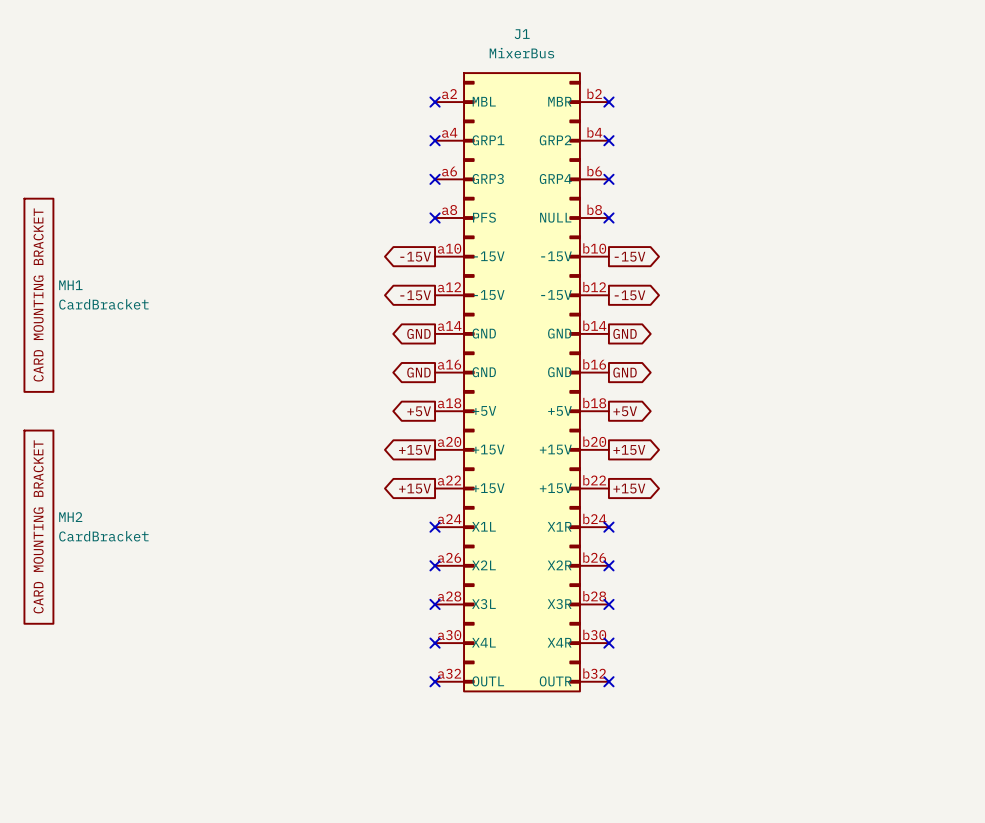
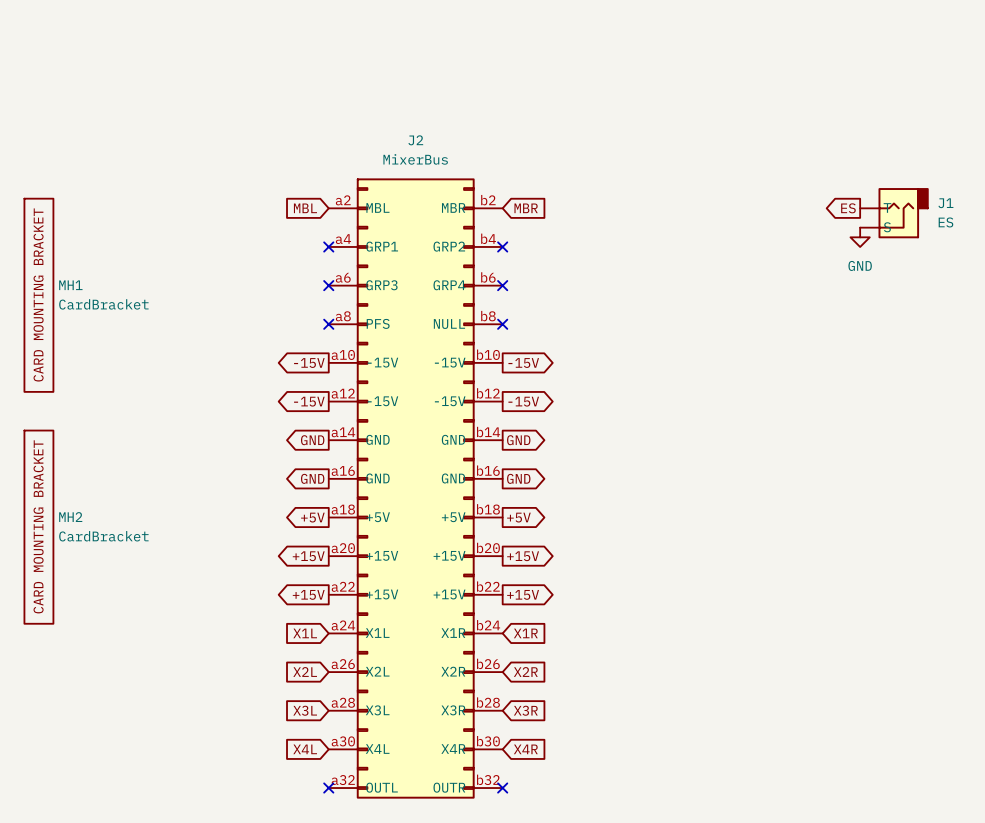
J1 name position: J1 (522, 34) -> J1 (945, 203)
J1 value: MixerBus (521, 53) -> ES (945, 222)
J1 symbol: [435, 72, 609, 693] -> [860, 188, 929, 239]
no-connect mark: (435, 102) -> none
no-connect mark: (608, 102) -> none
no-connect mark: (435, 140) -> none
no-connect mark: (608, 140) -> none
no-connect mark: (435, 179) -> none
no-connect mark: (608, 179) -> none
global label: none -> MBL (305, 208)
global label: none -> MBR (526, 208)
global label: none -> ES (848, 208)
no-connect mark: (435, 218) -> none
no-connect mark: (608, 218) -> none
power symbol: none -> GND (860, 237)
no-connect mark: none -> (328, 246)
no-connect mark: none -> (502, 246)
global label: -15V (415, 256) -> none
global label: -15V (630, 256) -> none
no-connect mark: none -> (328, 285)
no-connect mark: none -> (502, 285)
global label: -15V (415, 295) -> none
global label: -15V (630, 295) -> none
no-connect mark: none -> (328, 324)
no-connect mark: none -> (502, 324)
global label: GND (418, 333) -> none
global label: GND (625, 333) -> none
global label: none -> -15V (309, 363)
global label: none -> -15V (523, 363)
global label: GND (418, 372) -> none
global label: GND (625, 372) -> none
global label: none -> -15V (309, 401)
global label: none -> -15V (523, 401)
global label: +5V (419, 411) -> none
global label: +5V (625, 411) -> none
global label: none -> GND (312, 440)
global label: none -> GND (518, 440)
global label: +15V (414, 449) -> none
global label: +15V (629, 449) -> none
global label: none -> GND (312, 478)
global label: none -> GND (518, 478)
global label: +15V (414, 488) -> none
J2: none -> MixerBus (415, 488)
global label: +15V (629, 488) -> none
global label: none -> +5V (312, 517)
global label: none -> +5V (518, 517)
no-connect mark: (435, 527) -> none
no-connect mark: (608, 527) -> none
global label: none -> +15V (308, 556)
global label: none -> +15V (523, 556)
no-connect mark: (435, 565) -> none
no-connect mark: (608, 565) -> none
global label: none -> +15V (308, 594)
global label: none -> +15V (523, 594)
no-connect mark: (435, 604) -> none
no-connect mark: (608, 604) -> none
global label: none -> X1L (305, 633)
global label: none -> X1R (525, 633)
no-connect mark: (435, 643) -> none
no-connect mark: (608, 643) -> none
global label: none -> X2L (305, 672)
global label: none -> X2R (525, 672)
no-connect mark: (435, 681) -> none
no-connect mark: (608, 681) -> none
global label: none -> X3L (305, 710)
global label: none -> X3R (525, 710)
global label: none -> X4L (305, 749)
global label: none -> X4R (525, 749)
no-connect mark: none -> (328, 788)
no-connect mark: none -> (502, 788)

